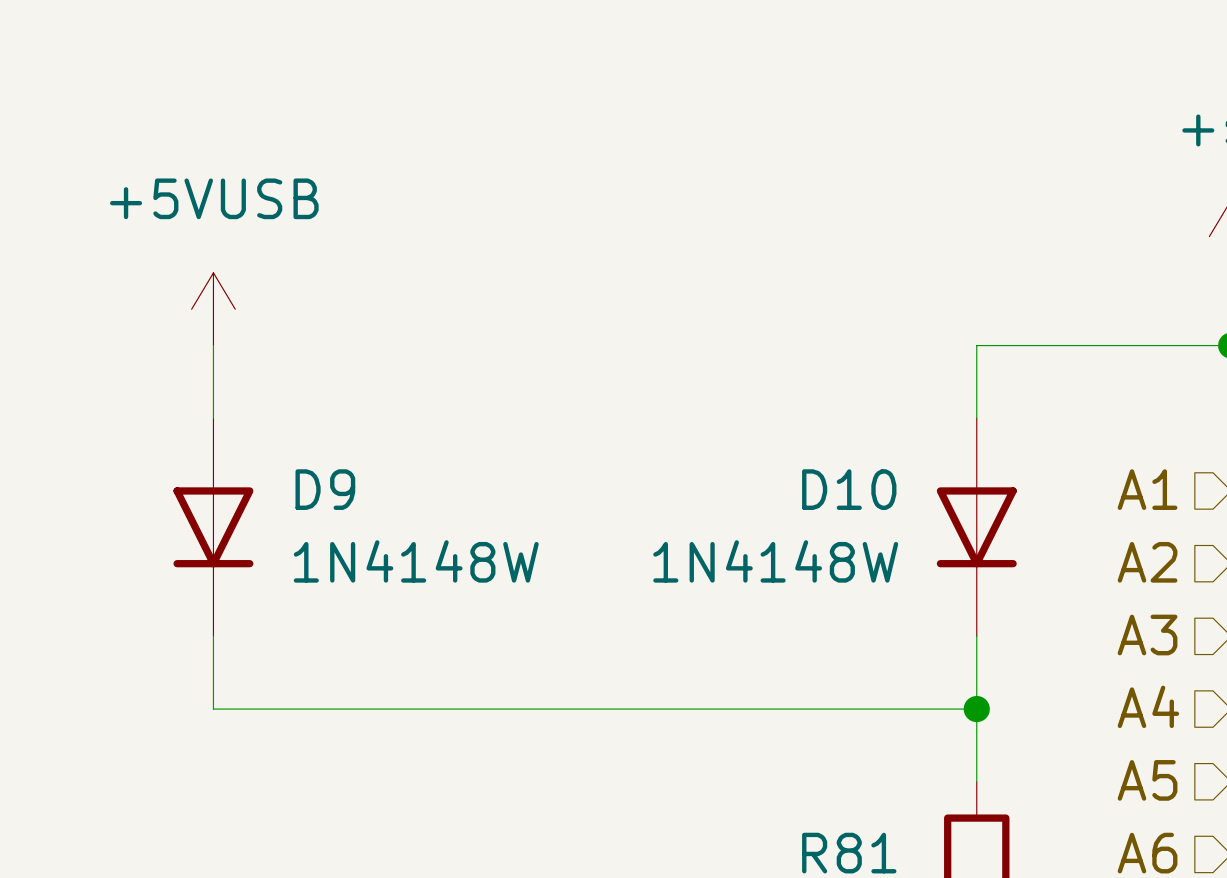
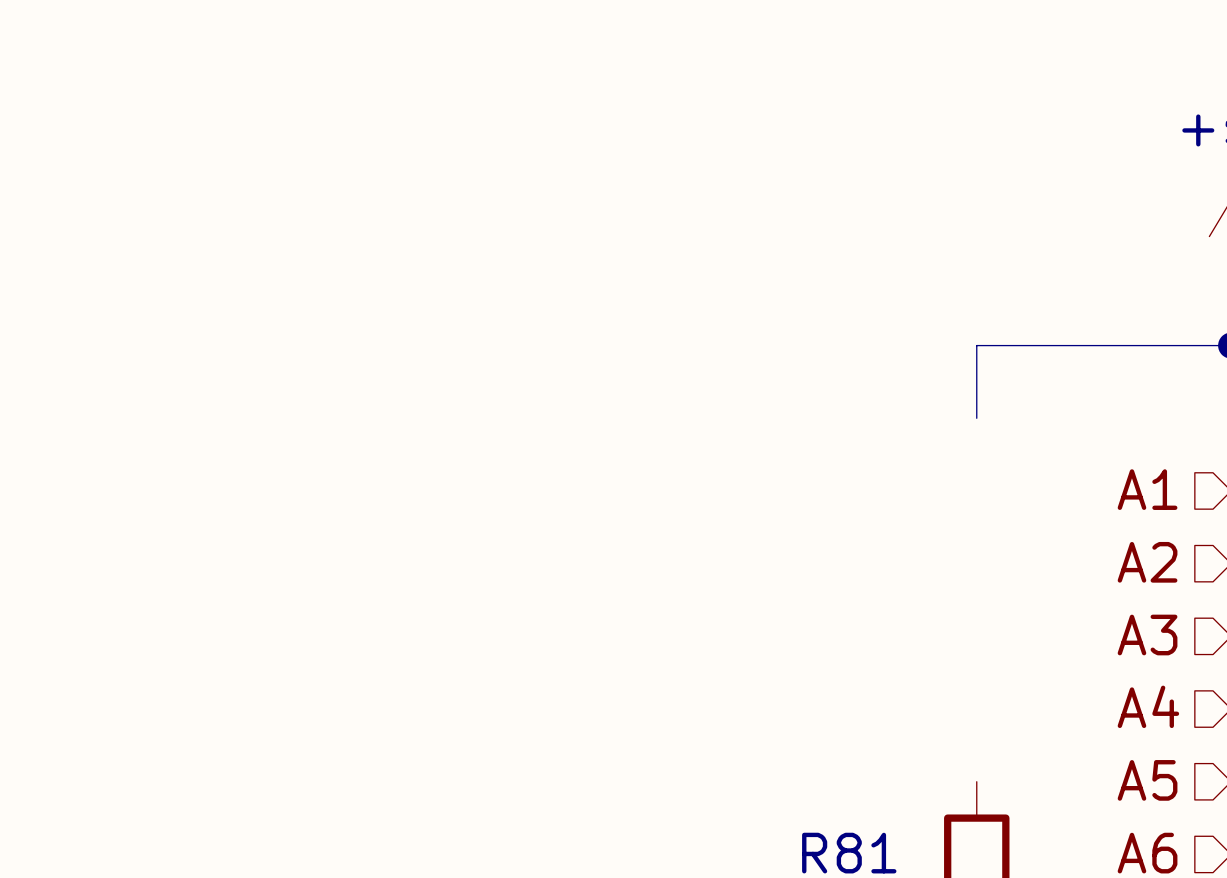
power symbol: +5VUSB (213, 309) -> none
wire: (213, 345) (213, 418) -> none
D9: 1N4148W (213, 527) -> none
D10: 1N4148W (976, 527) -> none
wire: (213, 636) (213, 709) (976, 709) -> none
wire: (976, 636) (976, 781) -> none
junction: (976, 709) -> none

